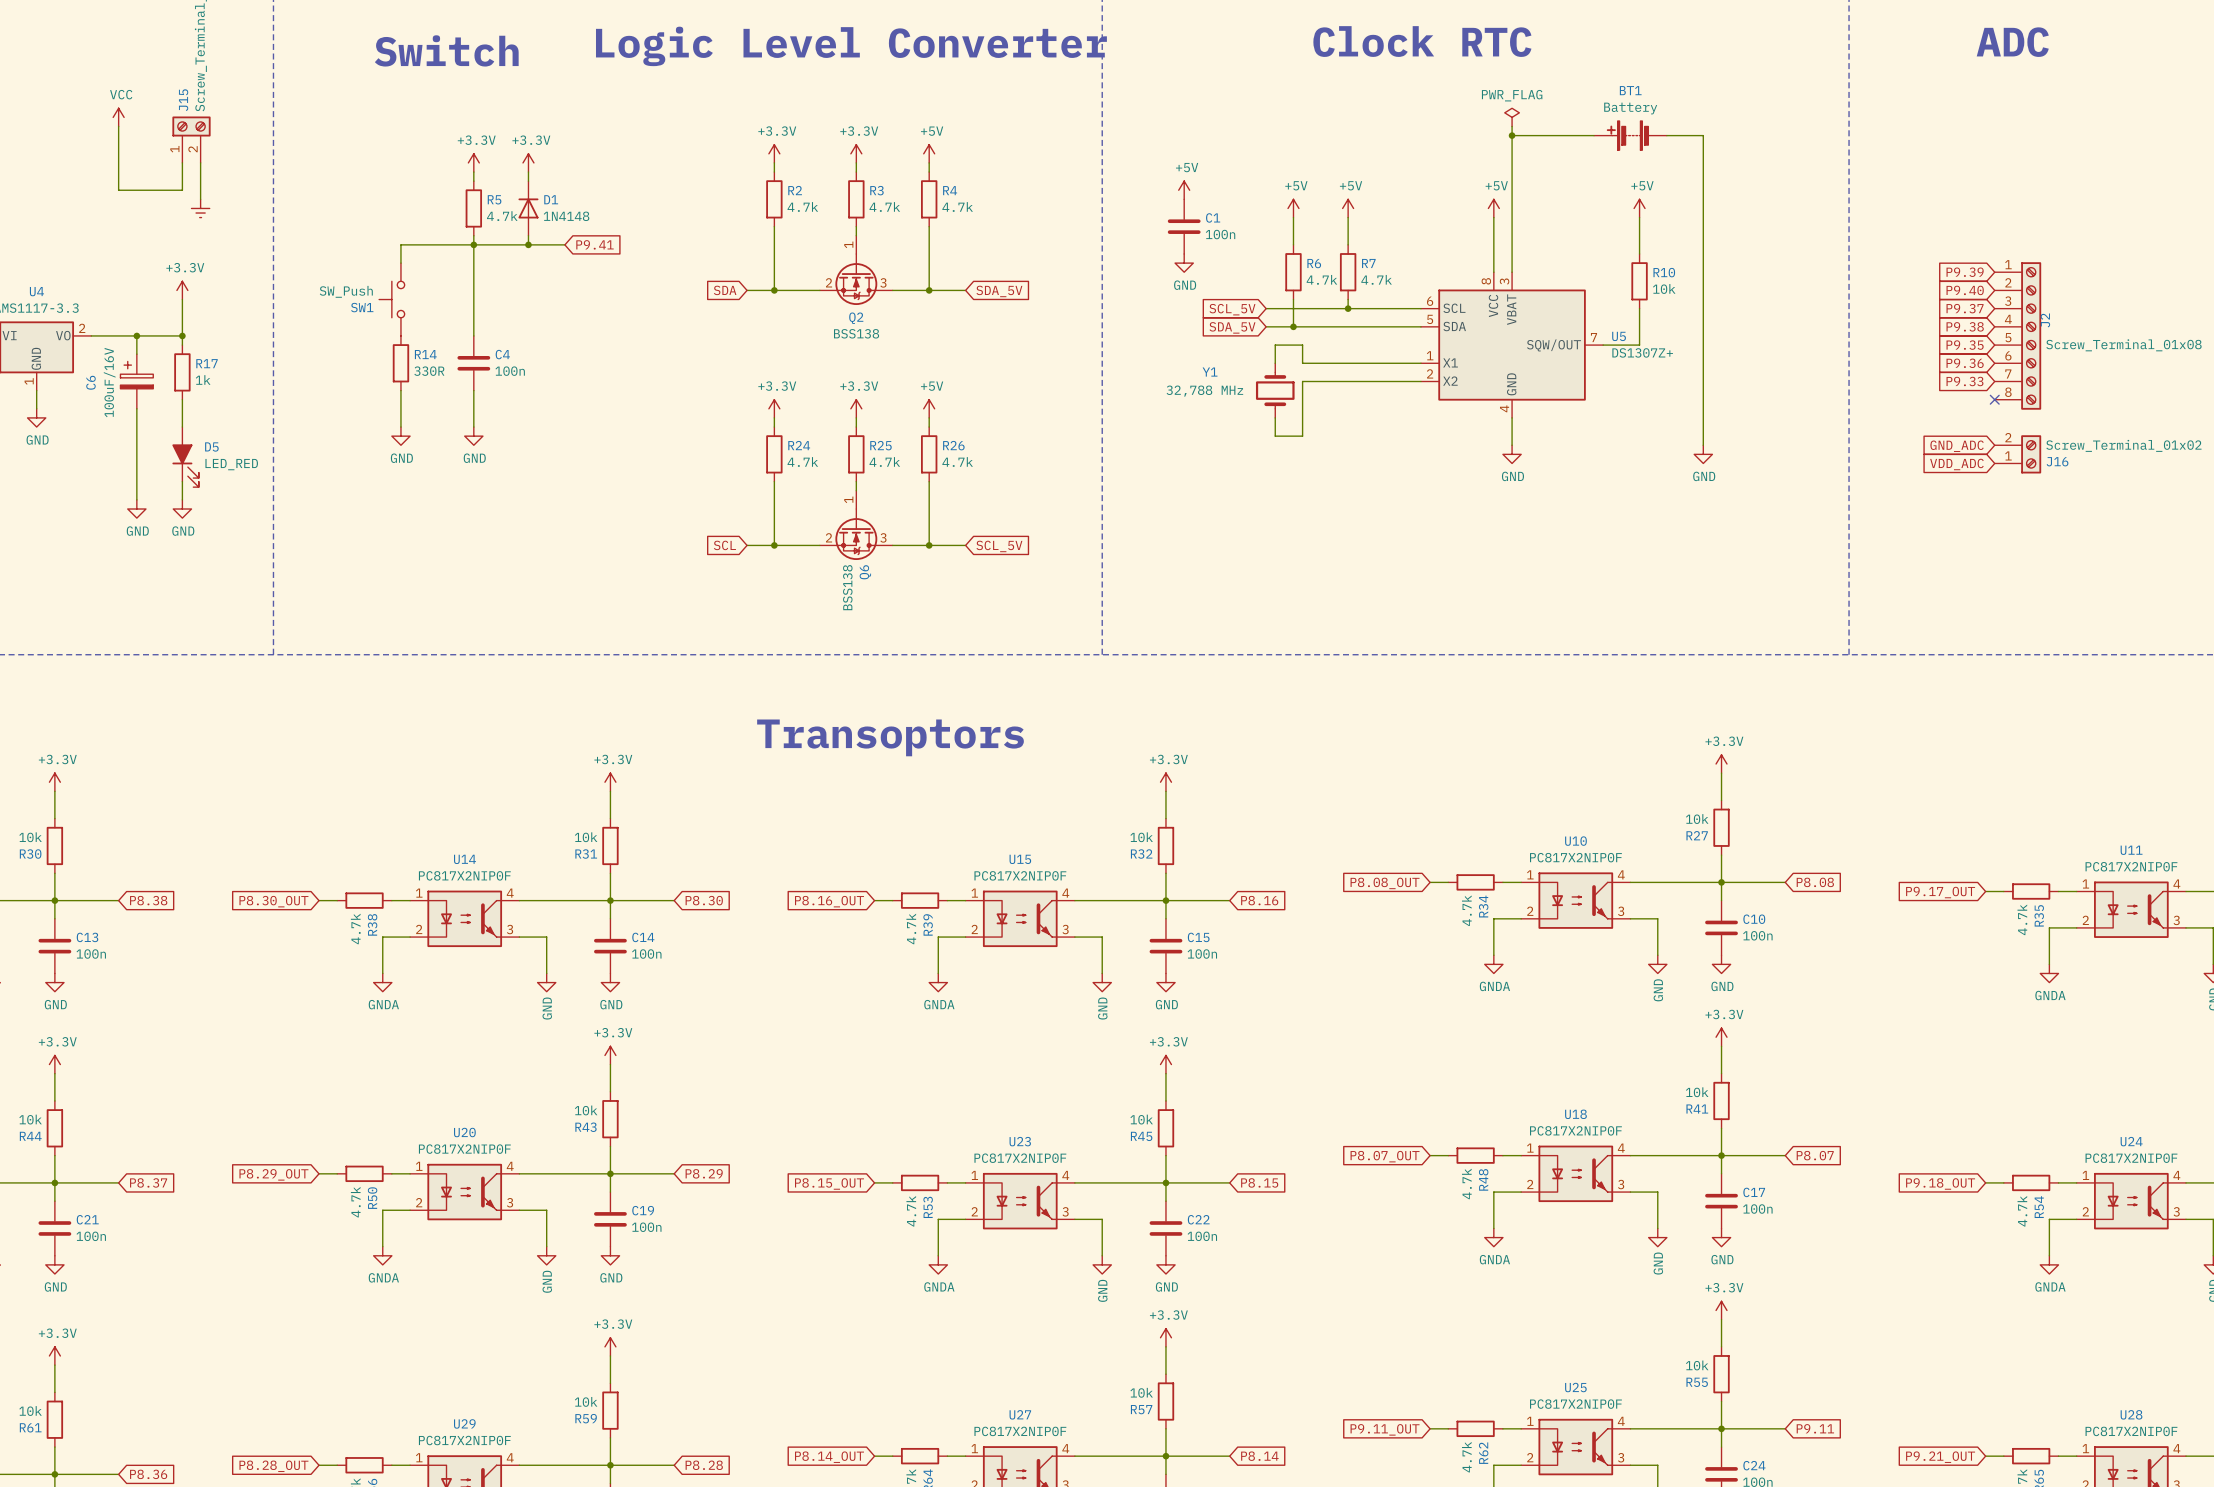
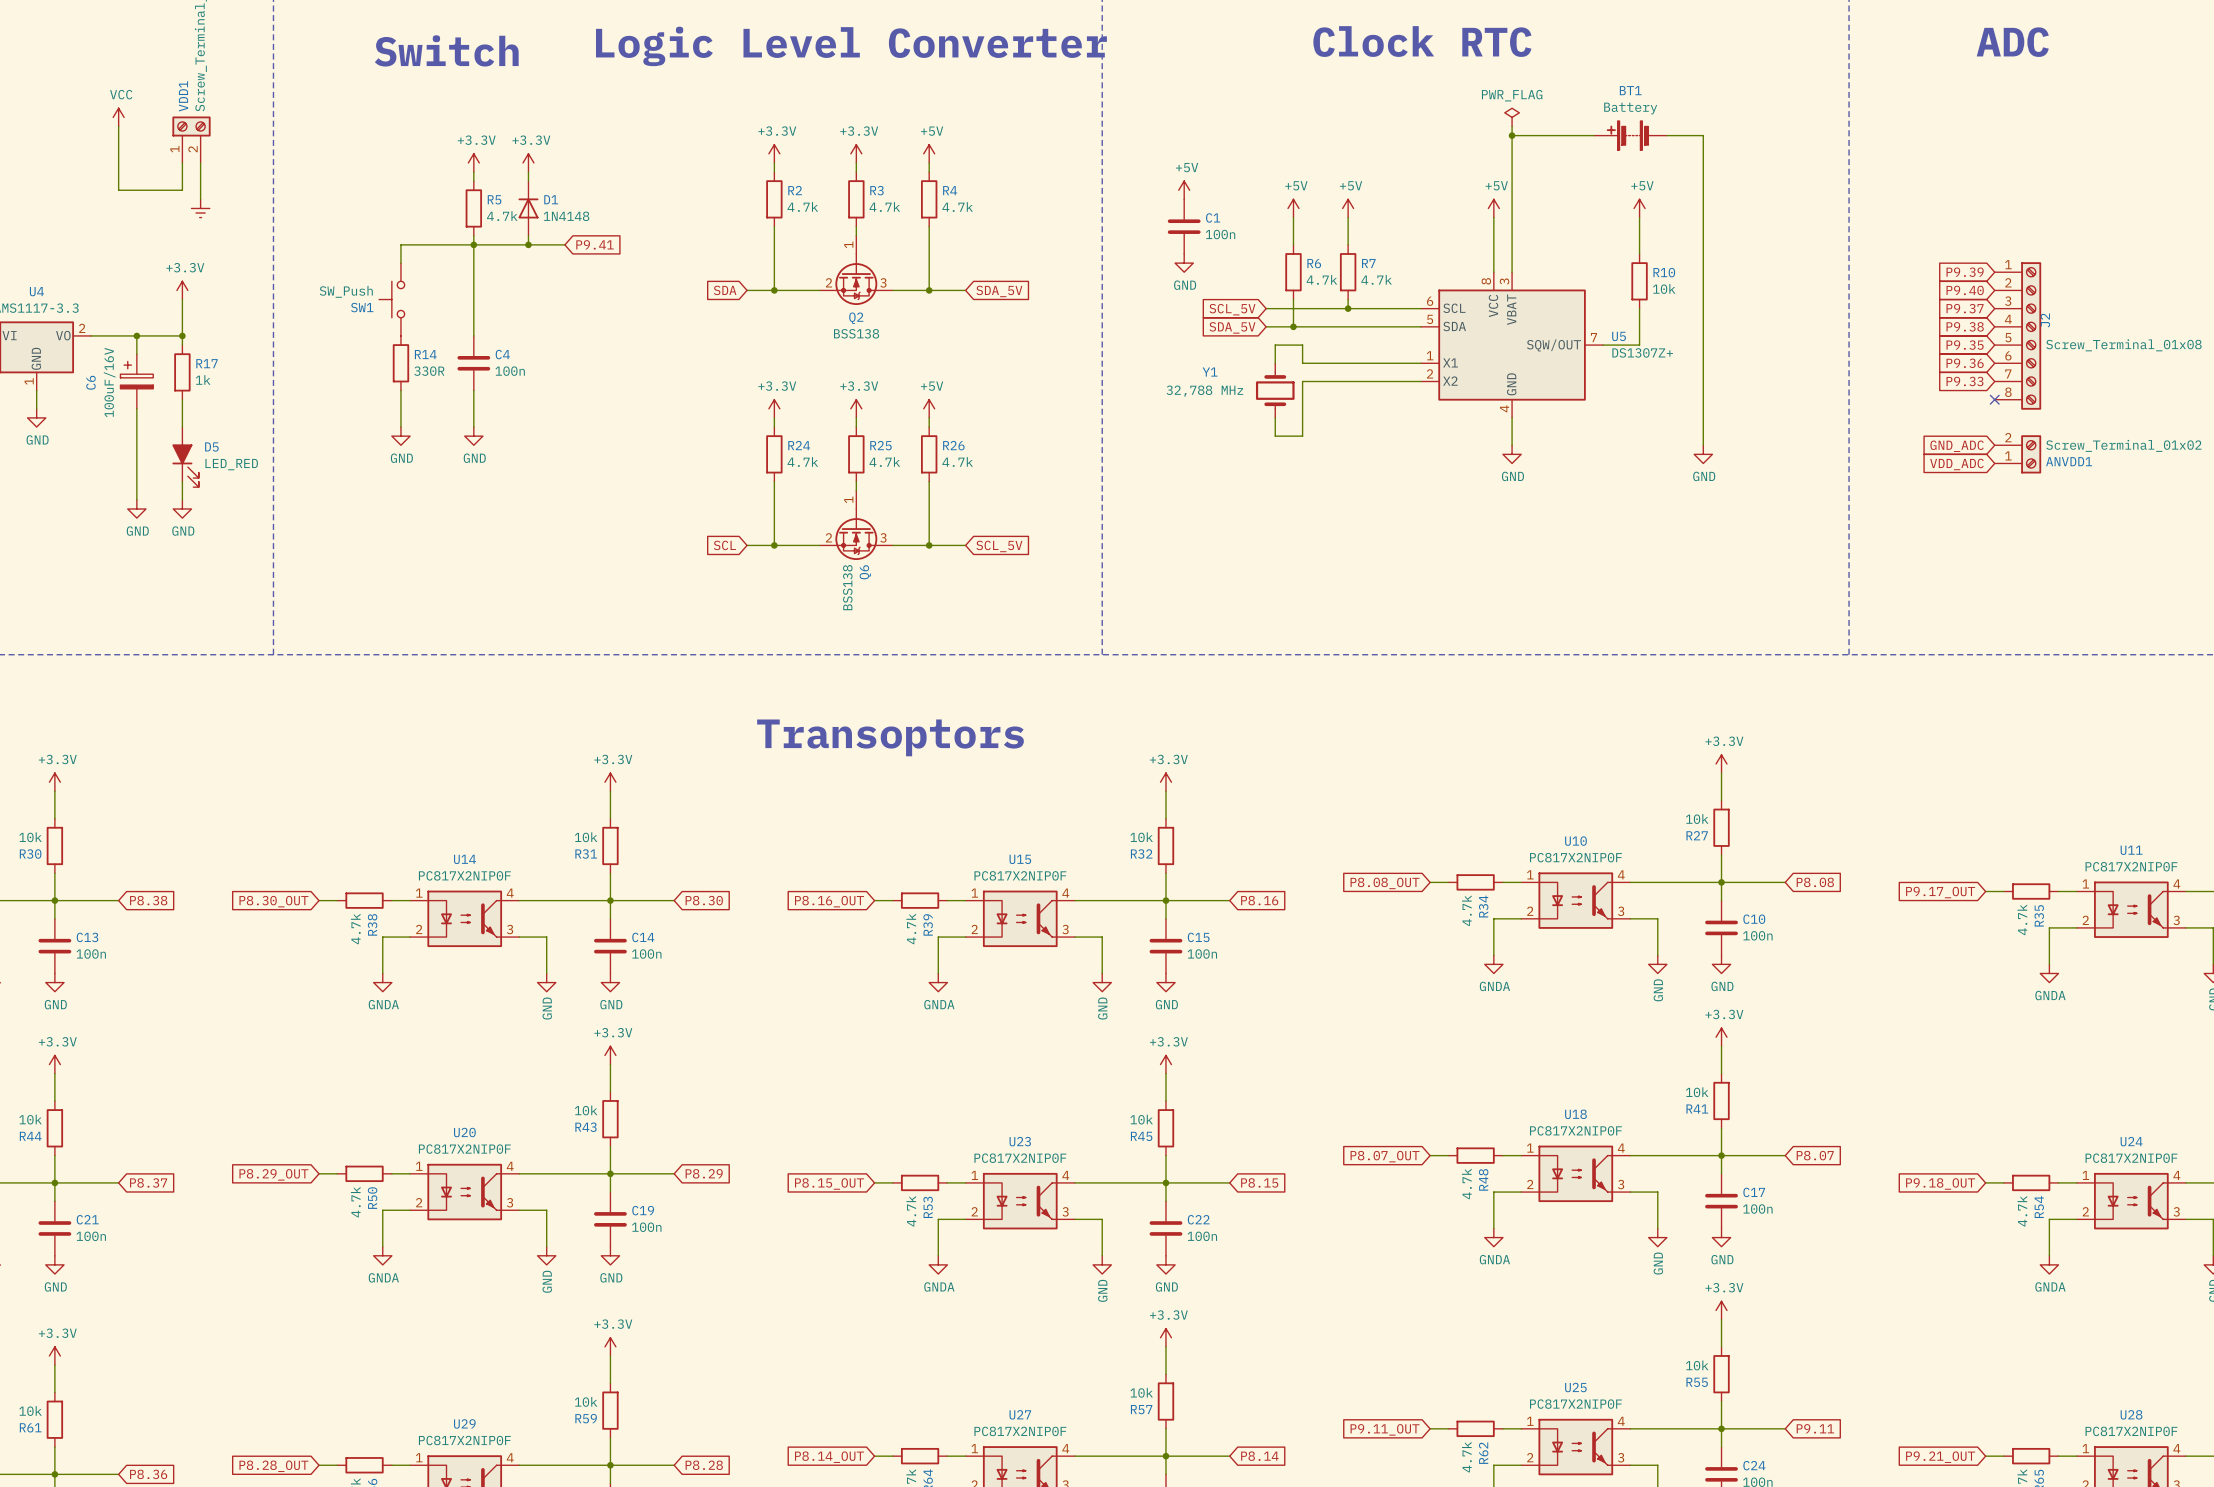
J15 name: J15 (183, 100) -> VDD1 (183, 96)
J16 name: J16 (2057, 461) -> ANVDD1 (2069, 461)

